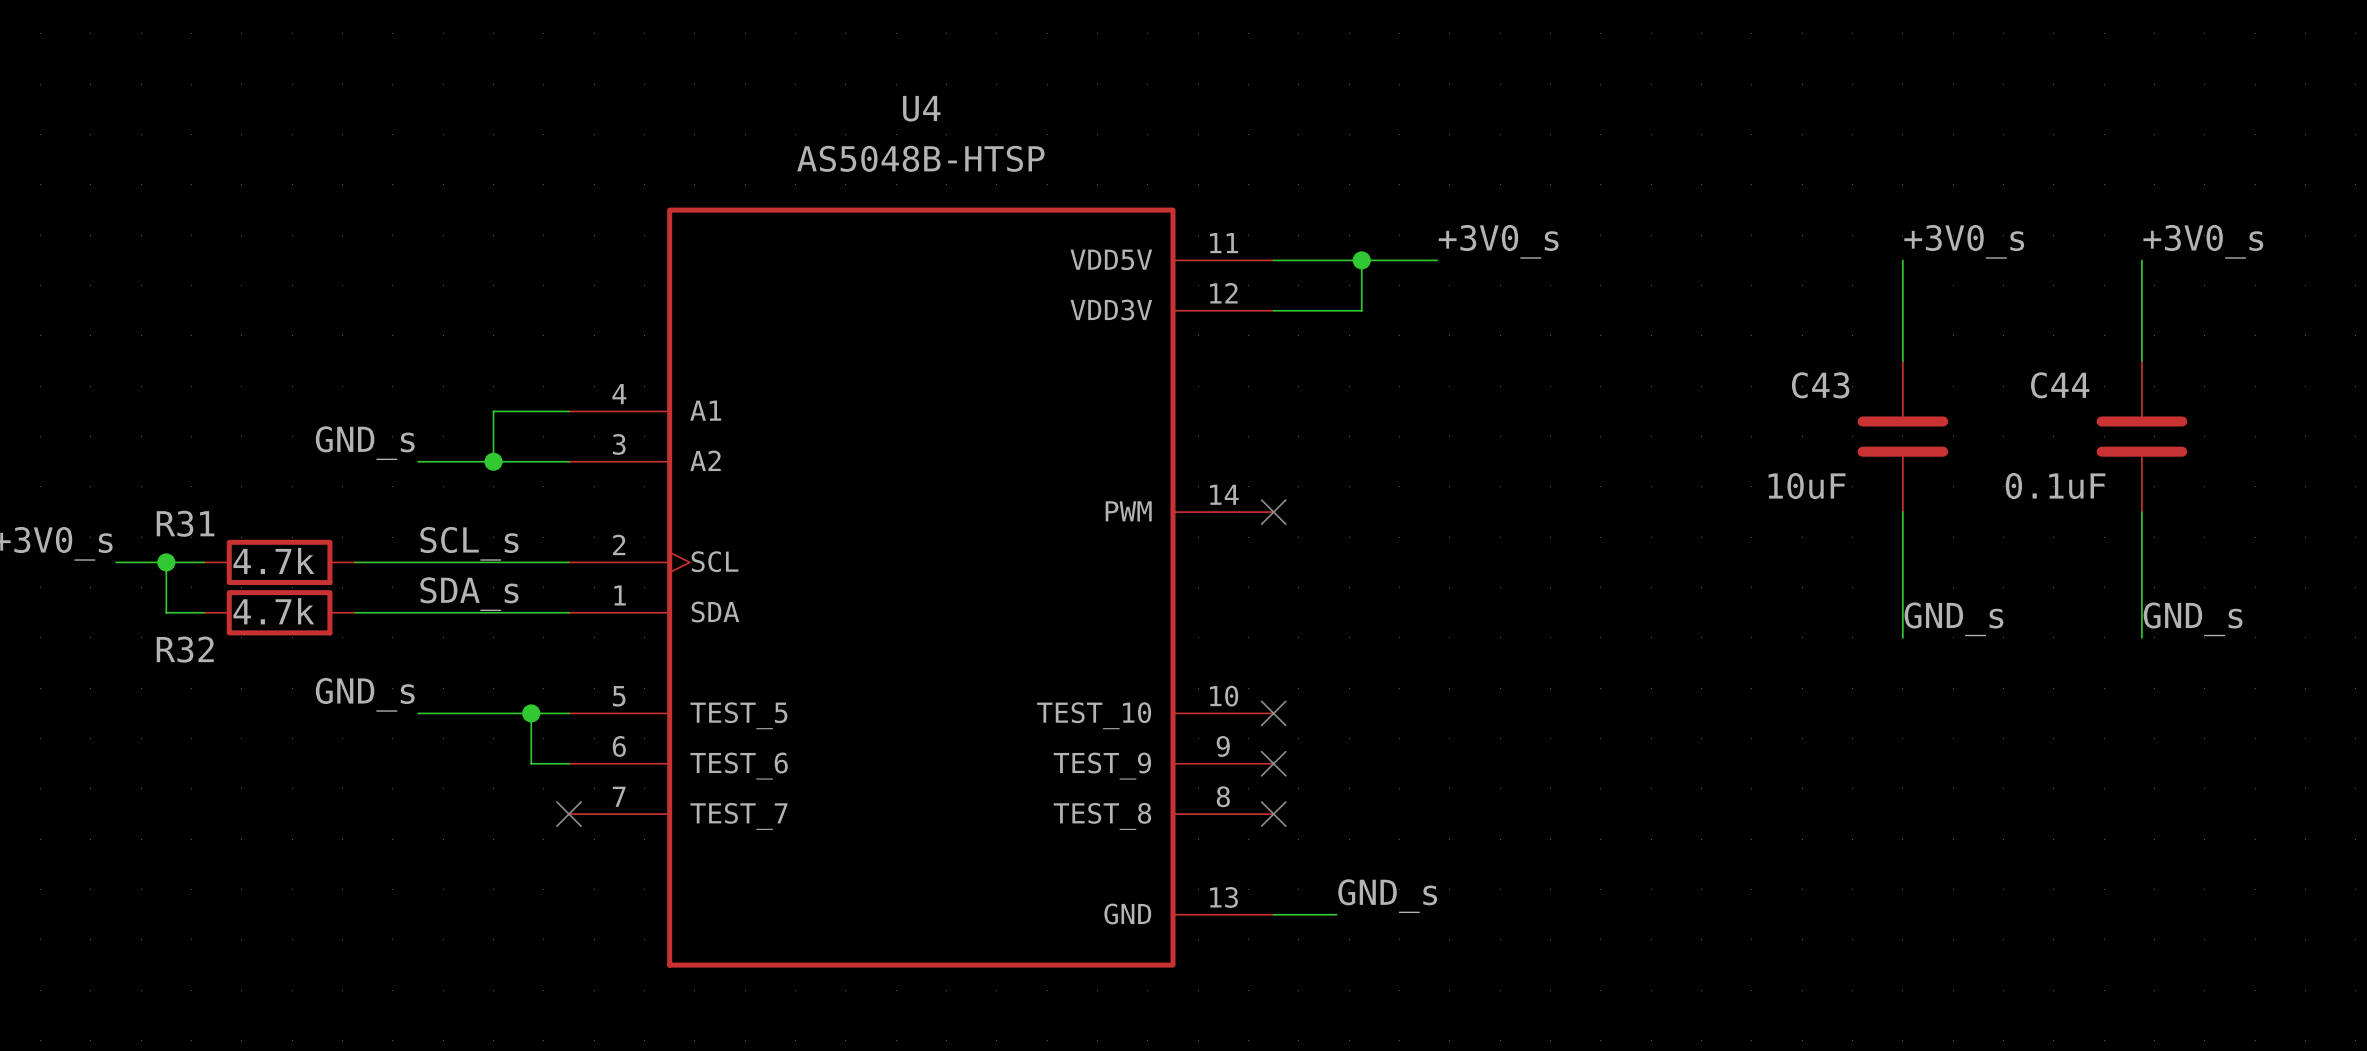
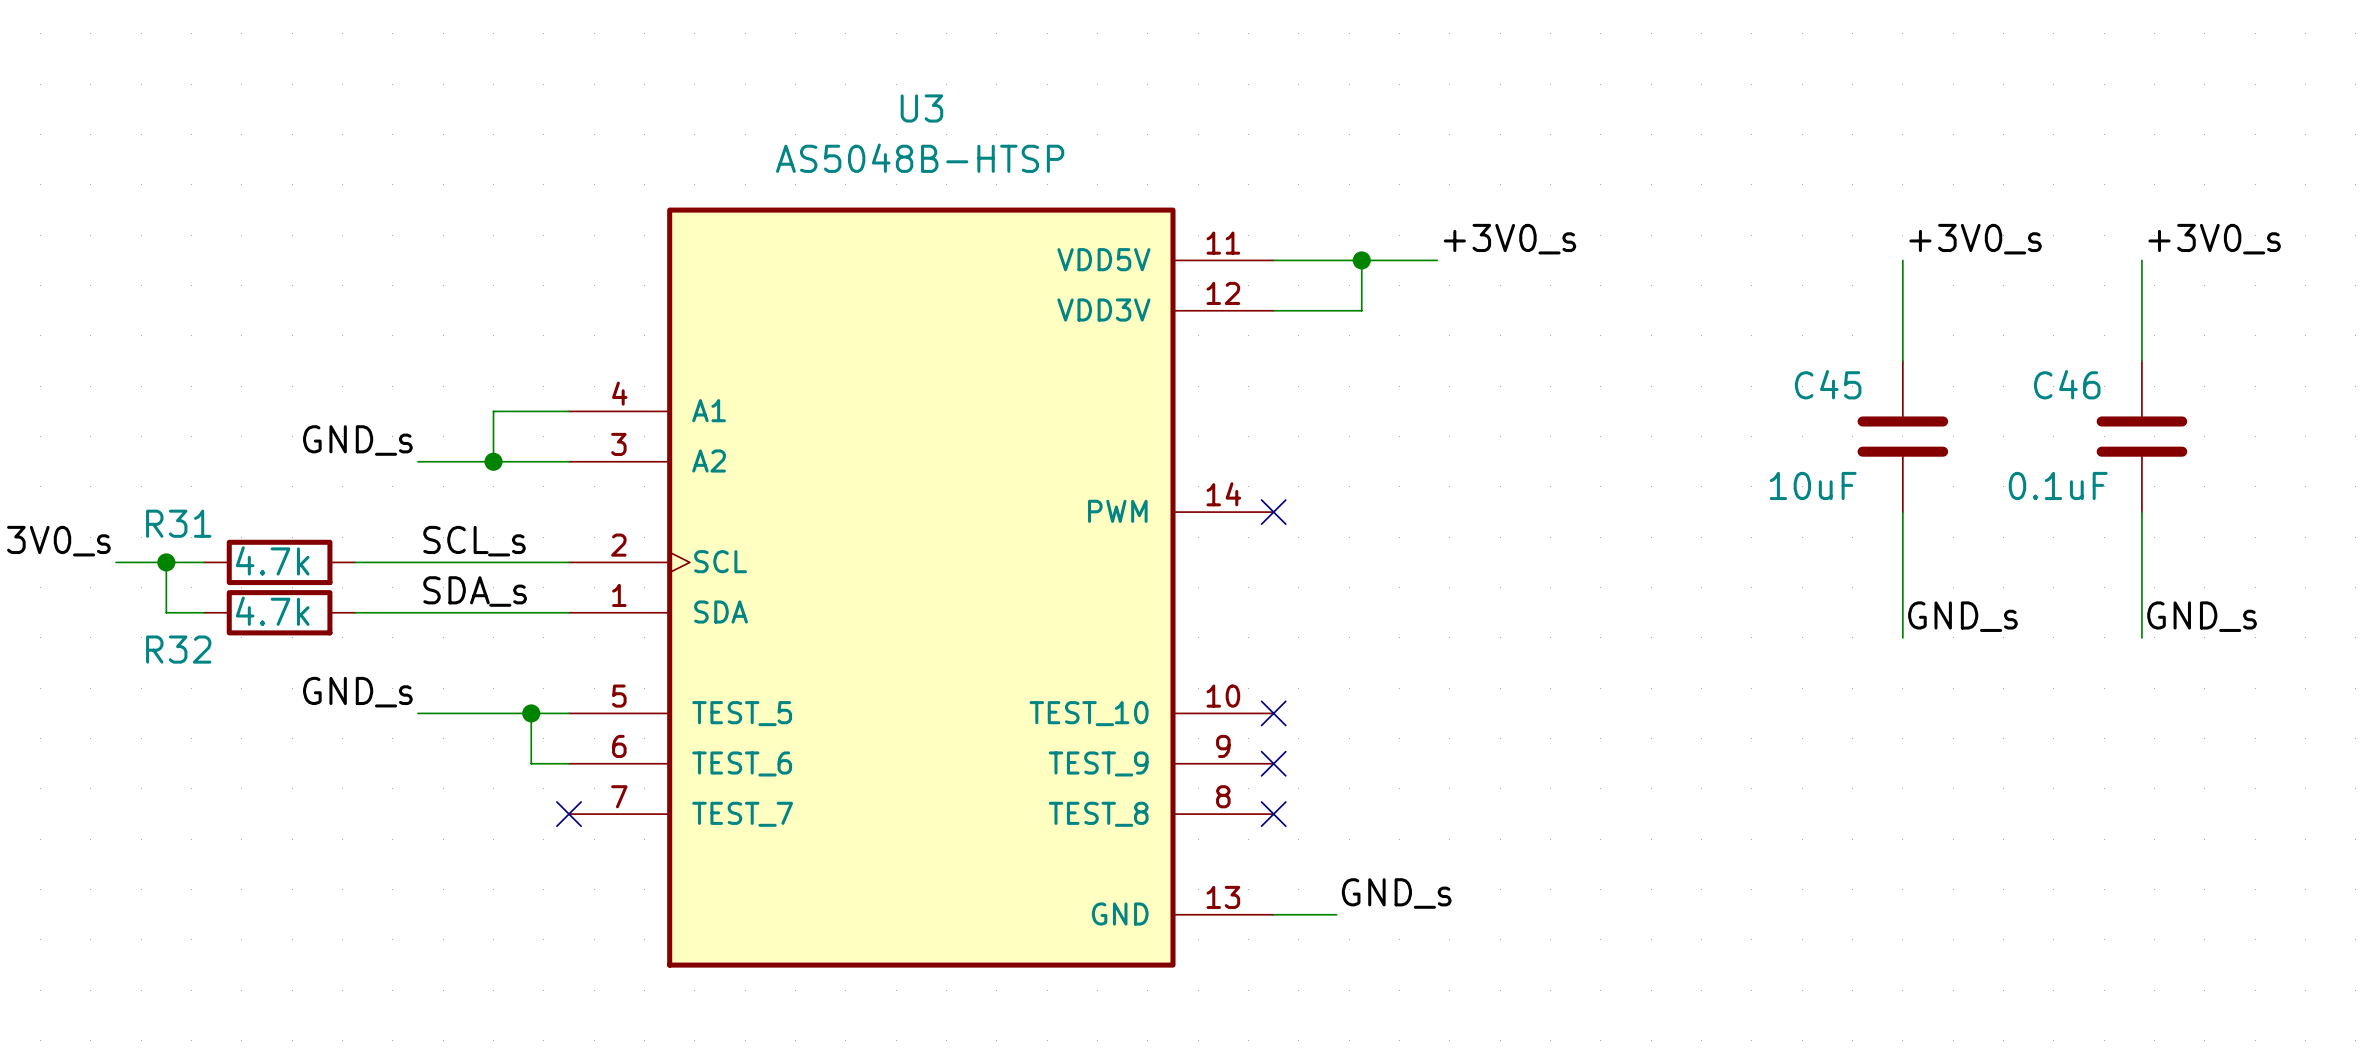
U4 name: U4 (921, 108) -> U3 (921, 108)
C43 name: C43 (1820, 385) -> C45 (1828, 384)
C44 name: C44 (2060, 385) -> C46 (2067, 384)

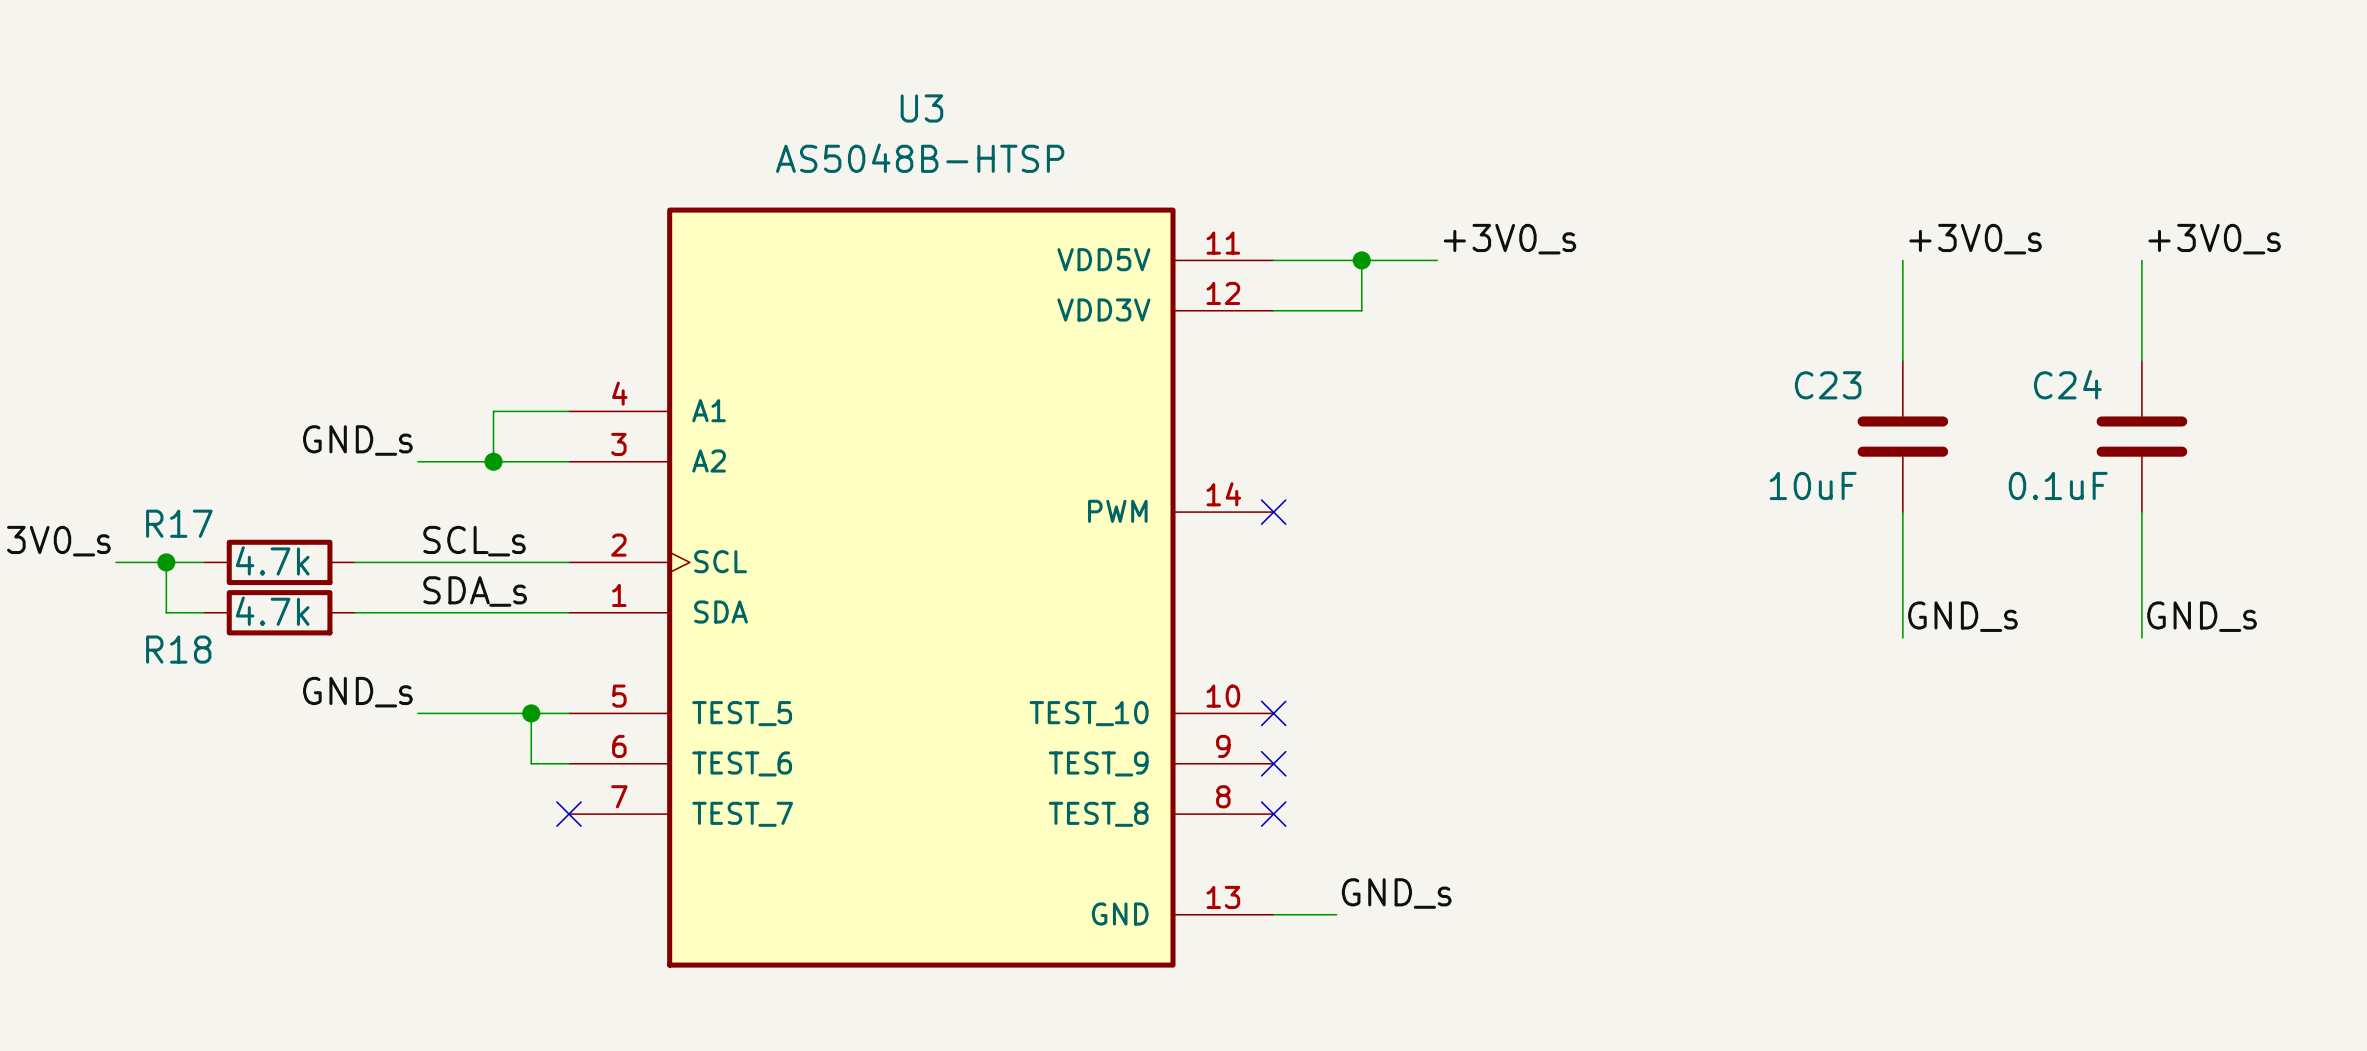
C45 name: C45 (1828, 384) -> C23 (1828, 385)
C46 name: C46 (2067, 384) -> C24 (2067, 384)
R31 name: R31 (178, 523) -> R17 (179, 523)
R32 name: R32 (178, 649) -> R18 (178, 649)

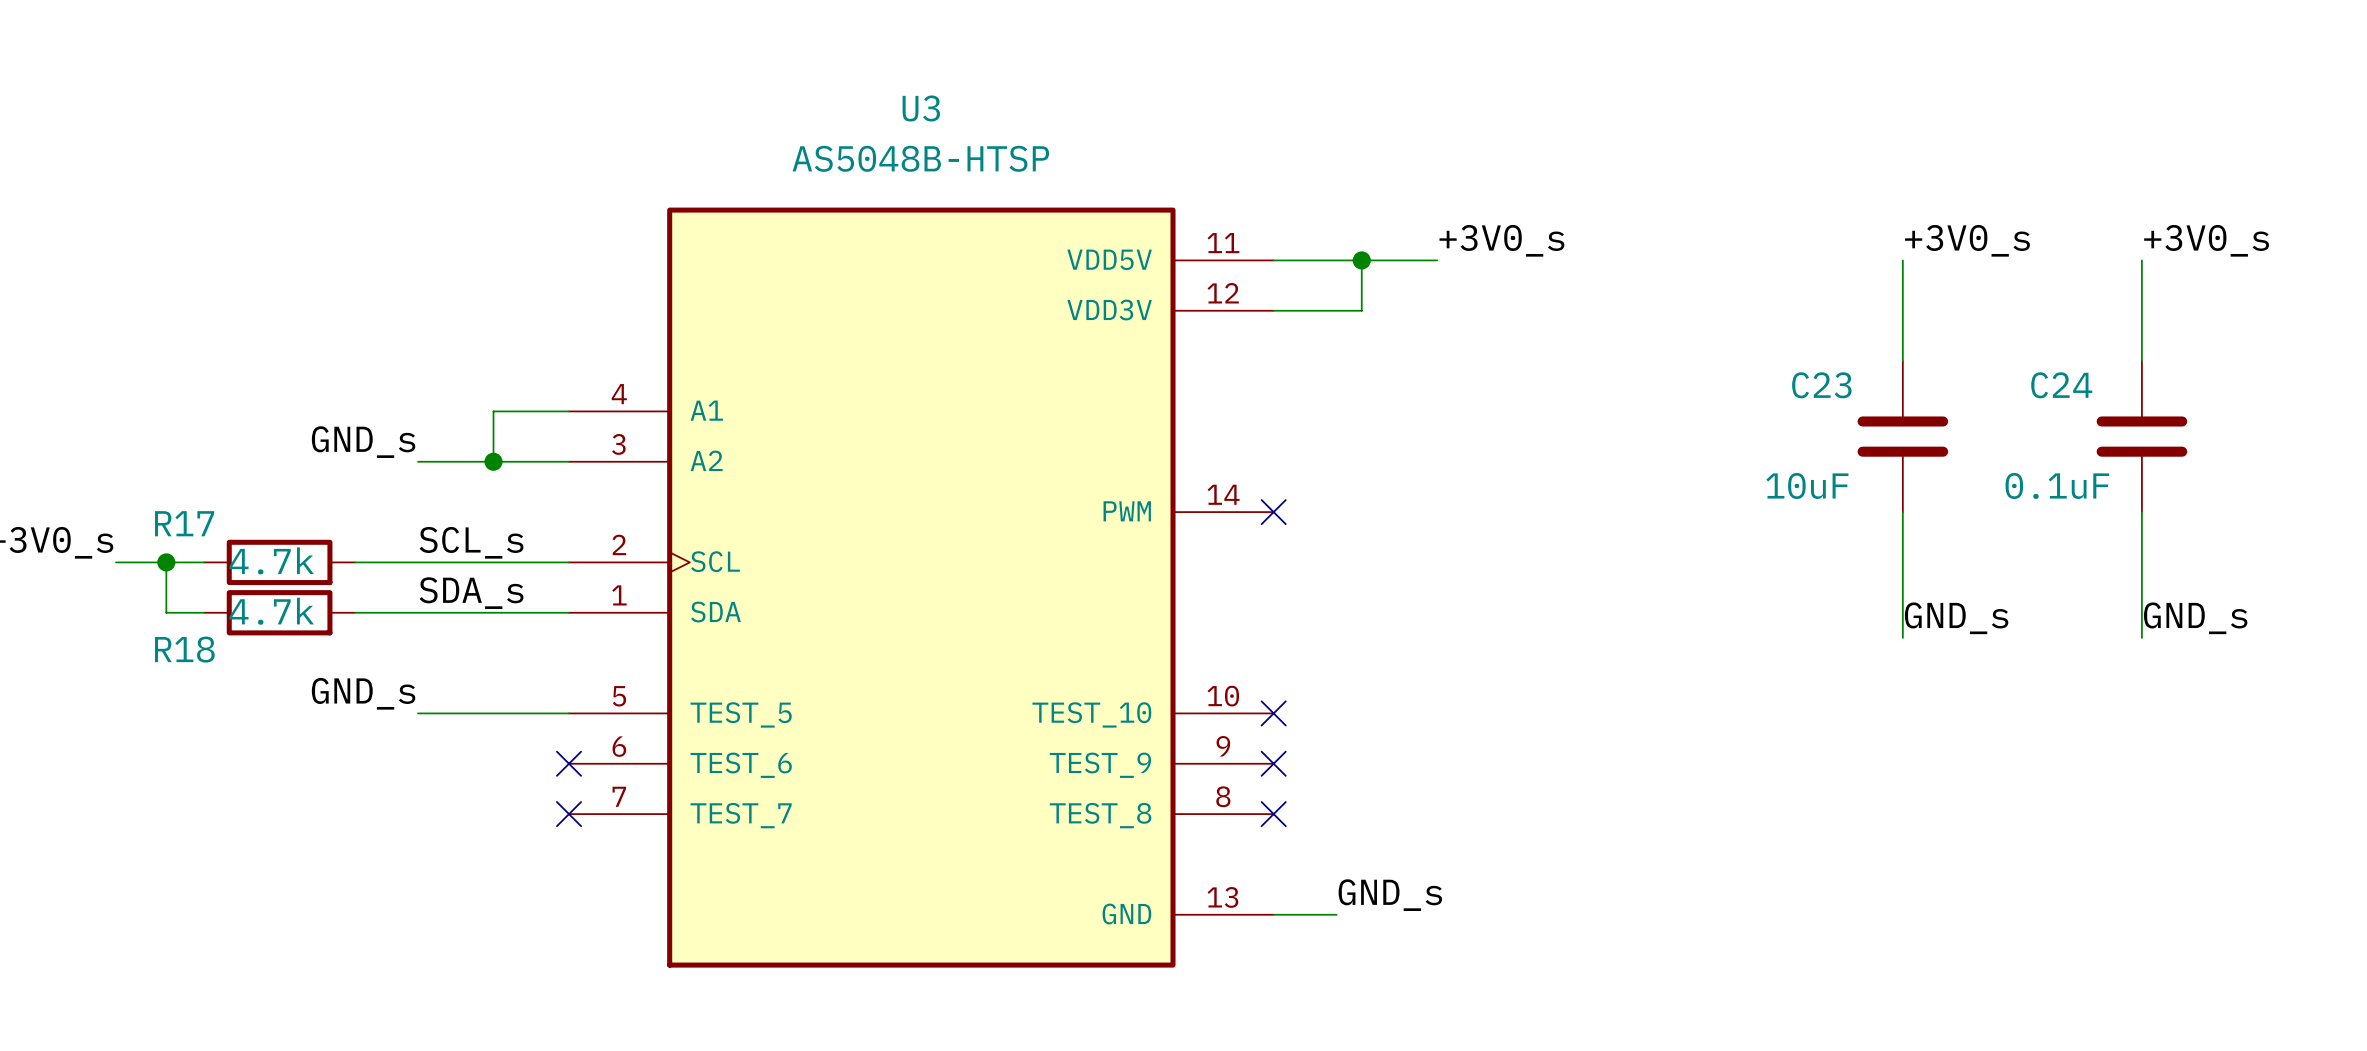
wire: (531, 713) (531, 763) (569, 763) -> none
junction: (531, 713) -> none
no-connect mark: none -> (569, 763)

